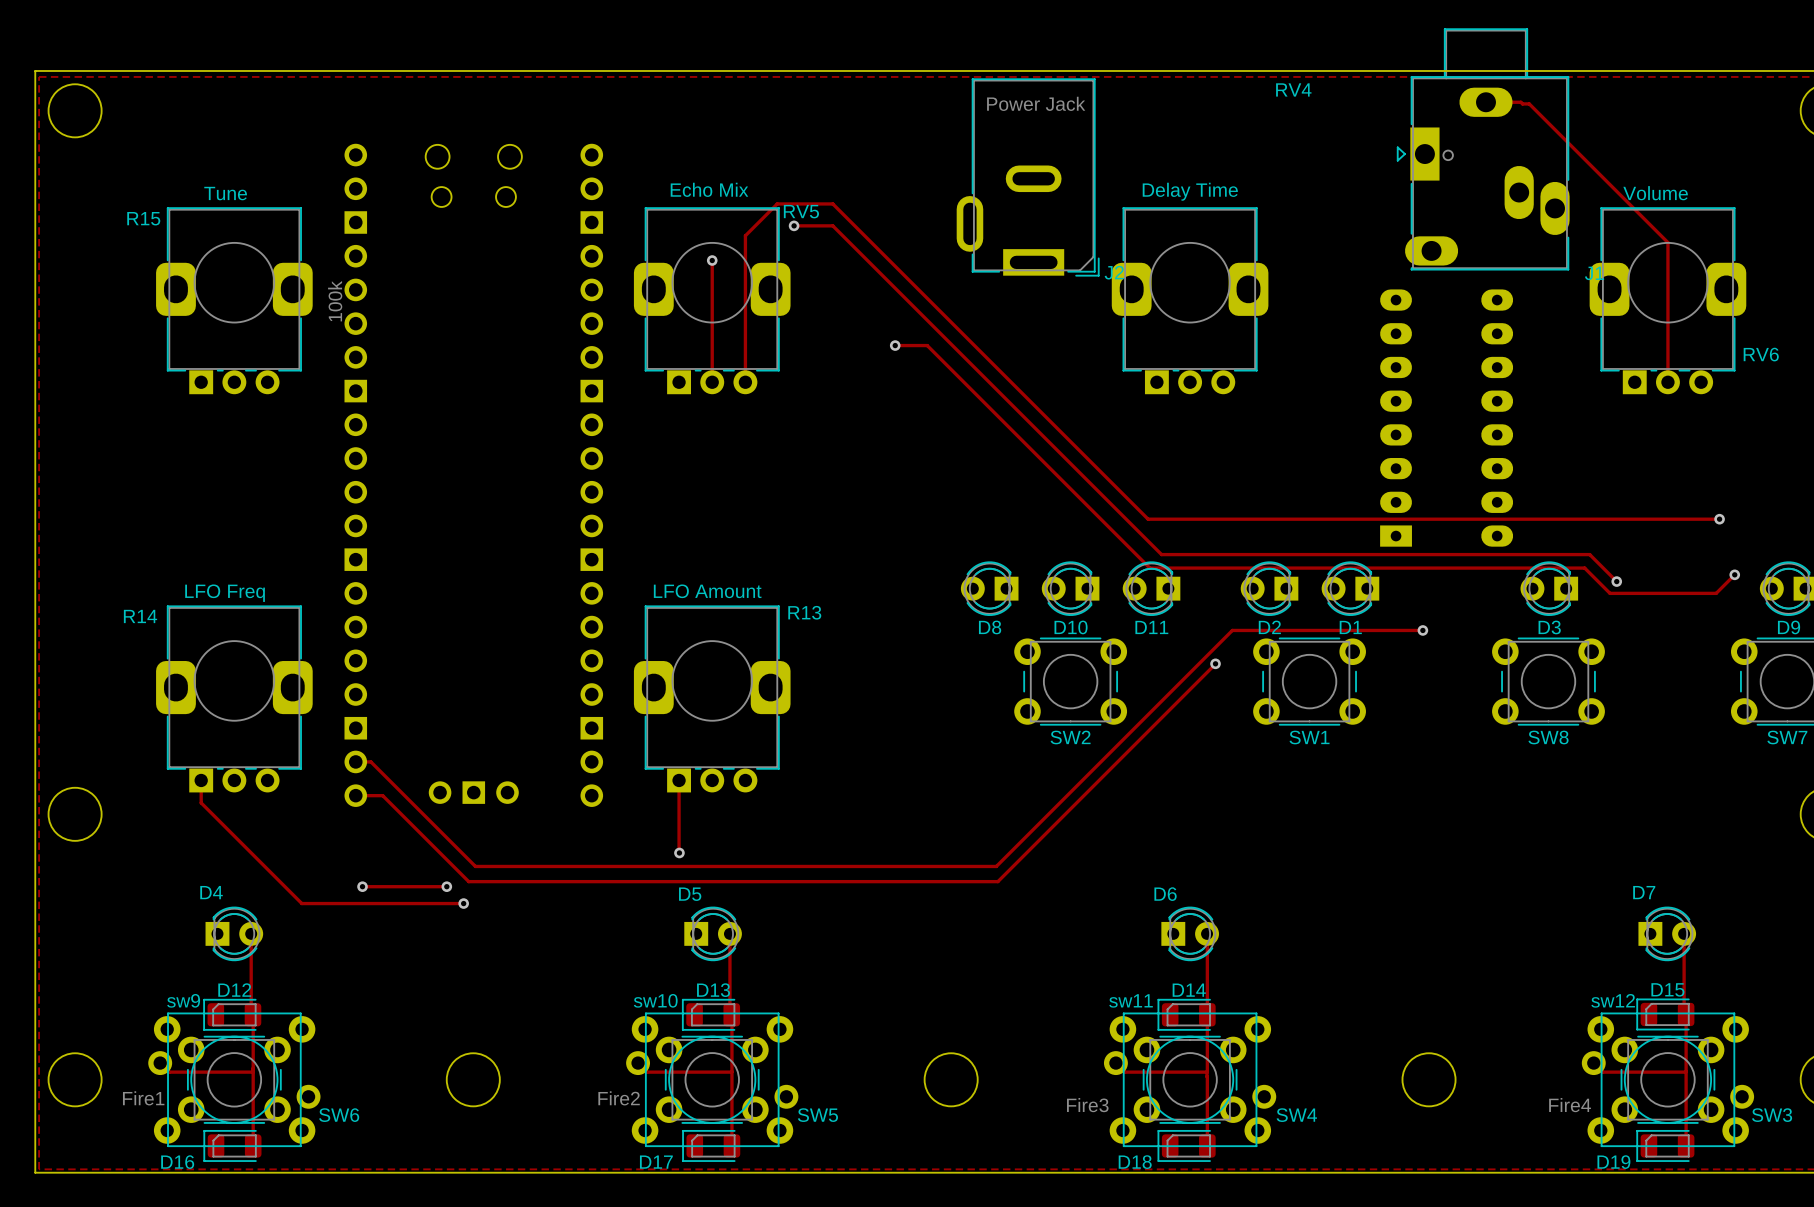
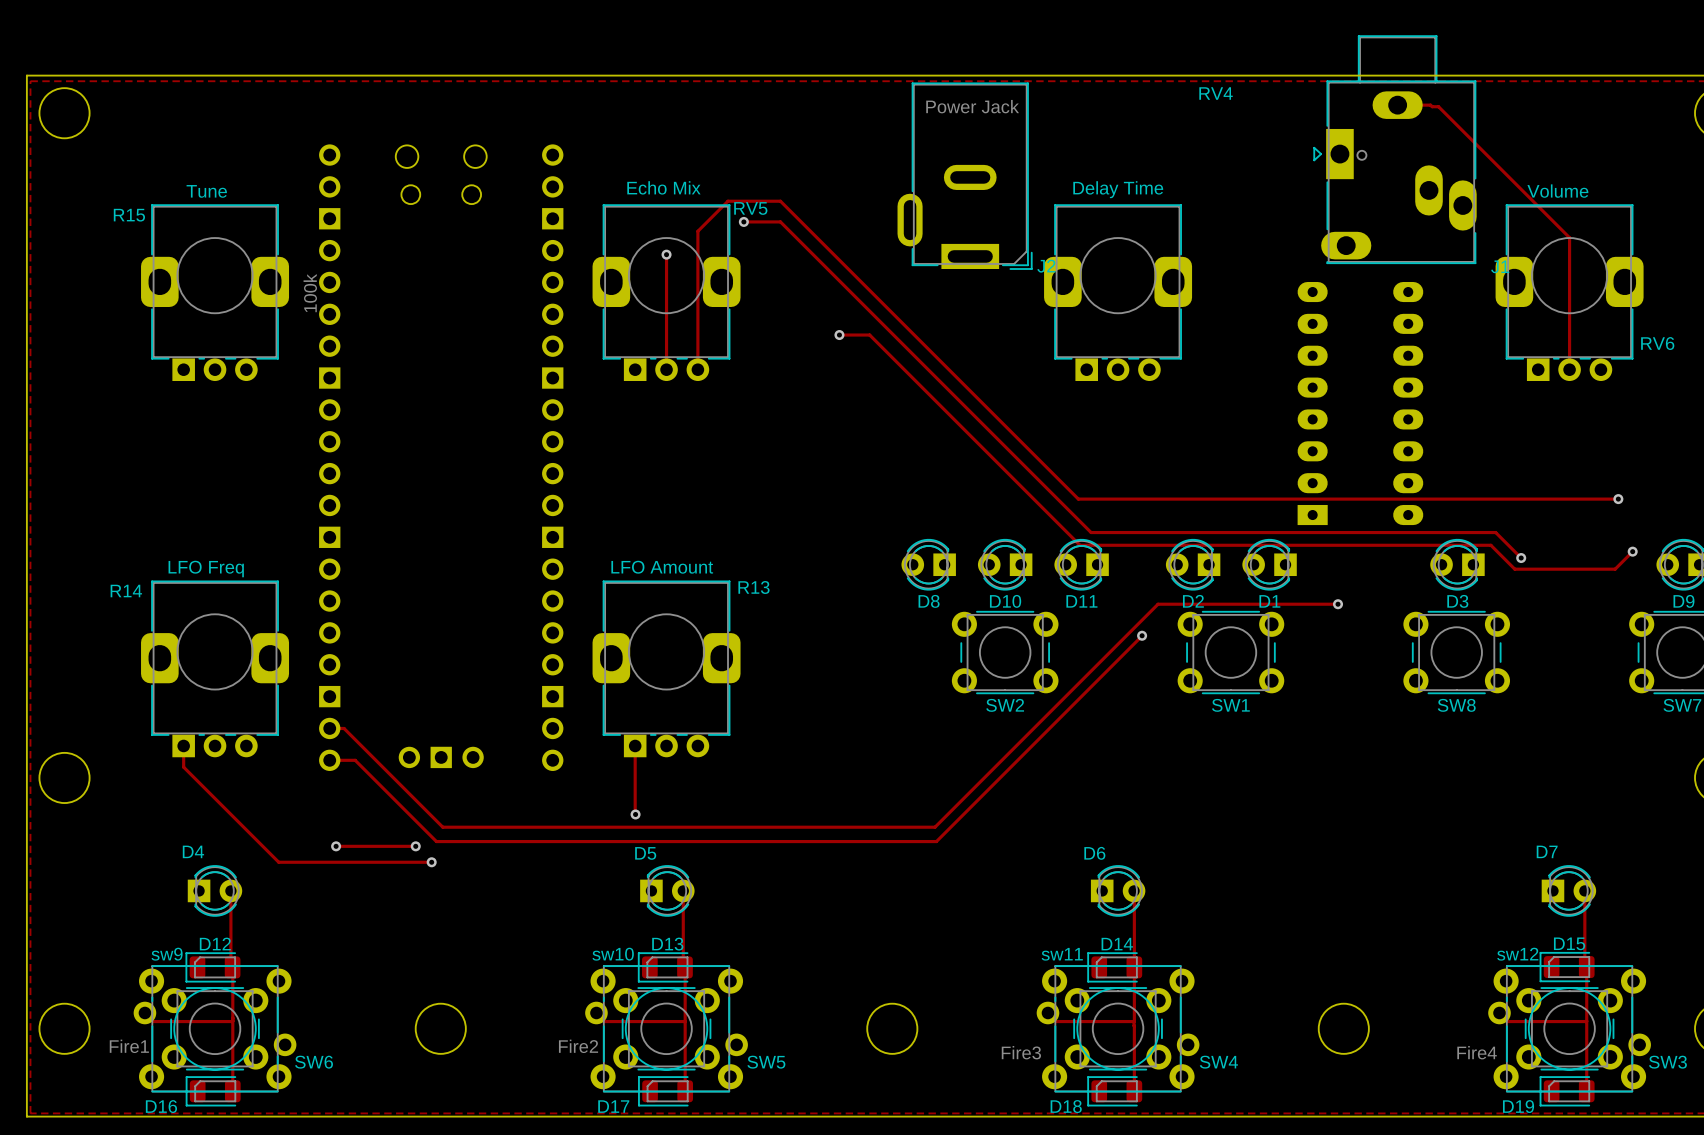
sw9 footprint: [148, 1012, 321, 1147] -> [133, 965, 297, 1093]
sw10 footprint: [626, 1012, 799, 1147] -> [585, 965, 748, 1093]
sw11 footprint: [1103, 1012, 1277, 1147] -> [1036, 965, 1200, 1093]
sw12 footprint: [1581, 1012, 1755, 1147] -> [1488, 965, 1651, 1093]

